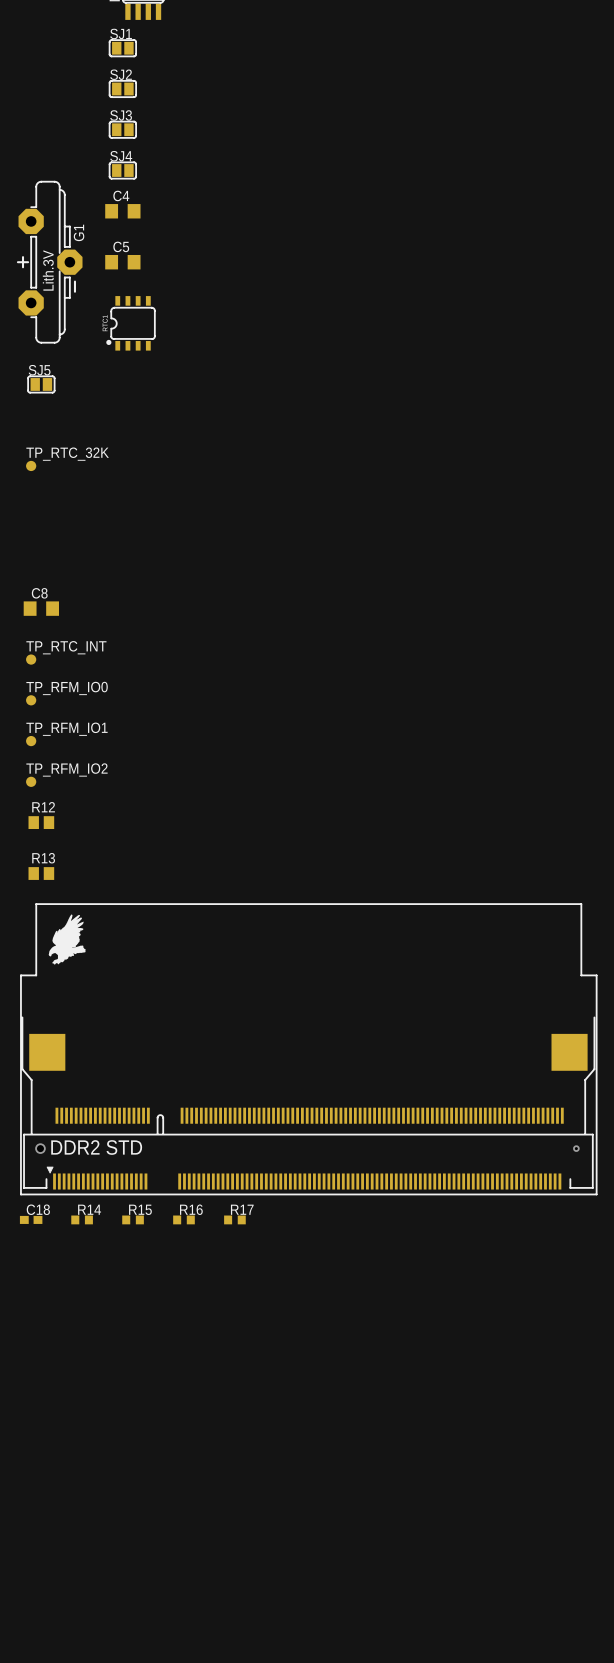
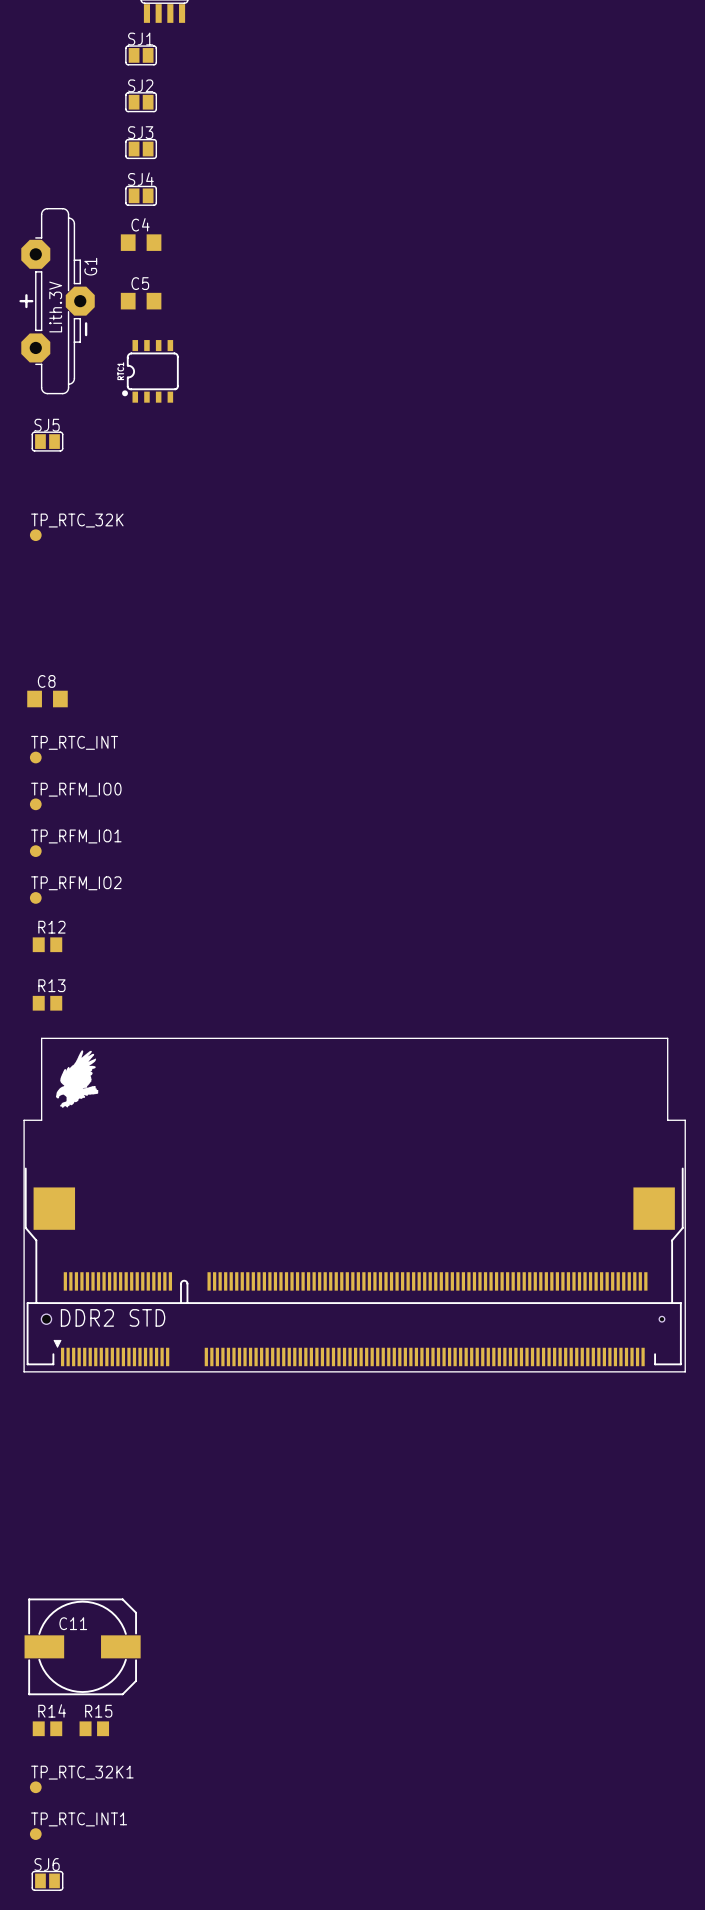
R14 footprint: [71, 1215, 93, 1225] -> [32, 1721, 63, 1737]
R15 footprint: [122, 1215, 144, 1225] -> [79, 1721, 110, 1737]
C18: (31, 1219) -> none
R16: (183, 1219) -> none
R17: (234, 1219) -> none
C11: none -> (82, 1646)
TP_RTC_32K1: none -> (35, 1787)
TP_RTC_INT1: none -> (35, 1834)
SJ6: none -> (47, 1880)

